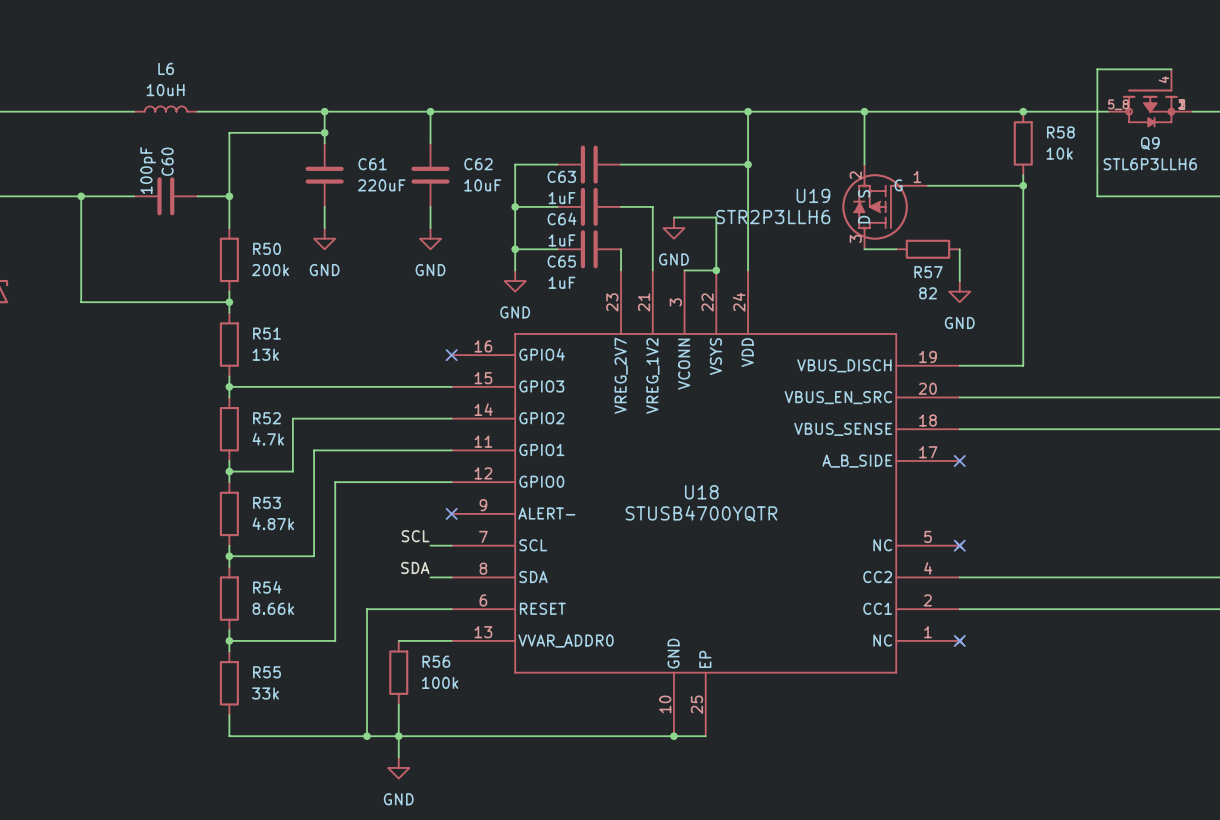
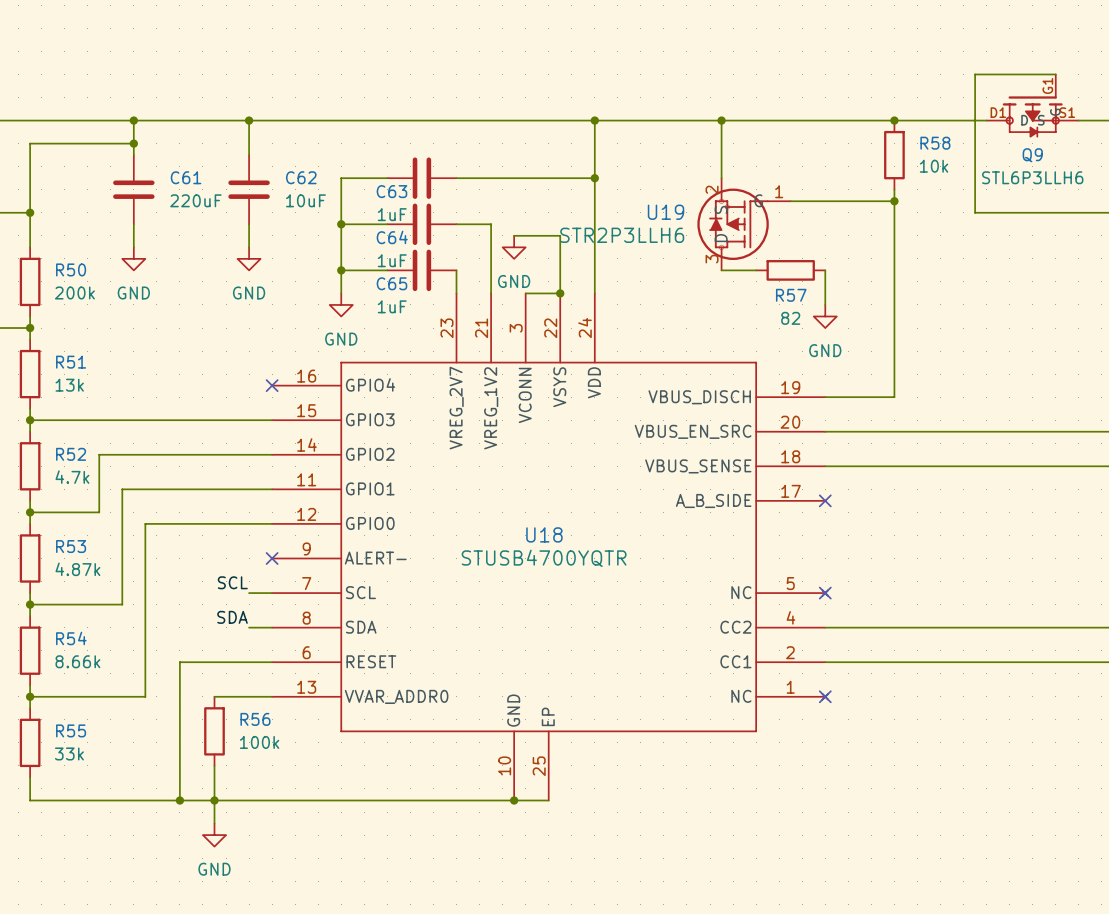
Q9 symbol: [1107, 69, 1193, 128] -> [986, 74, 1079, 138]

